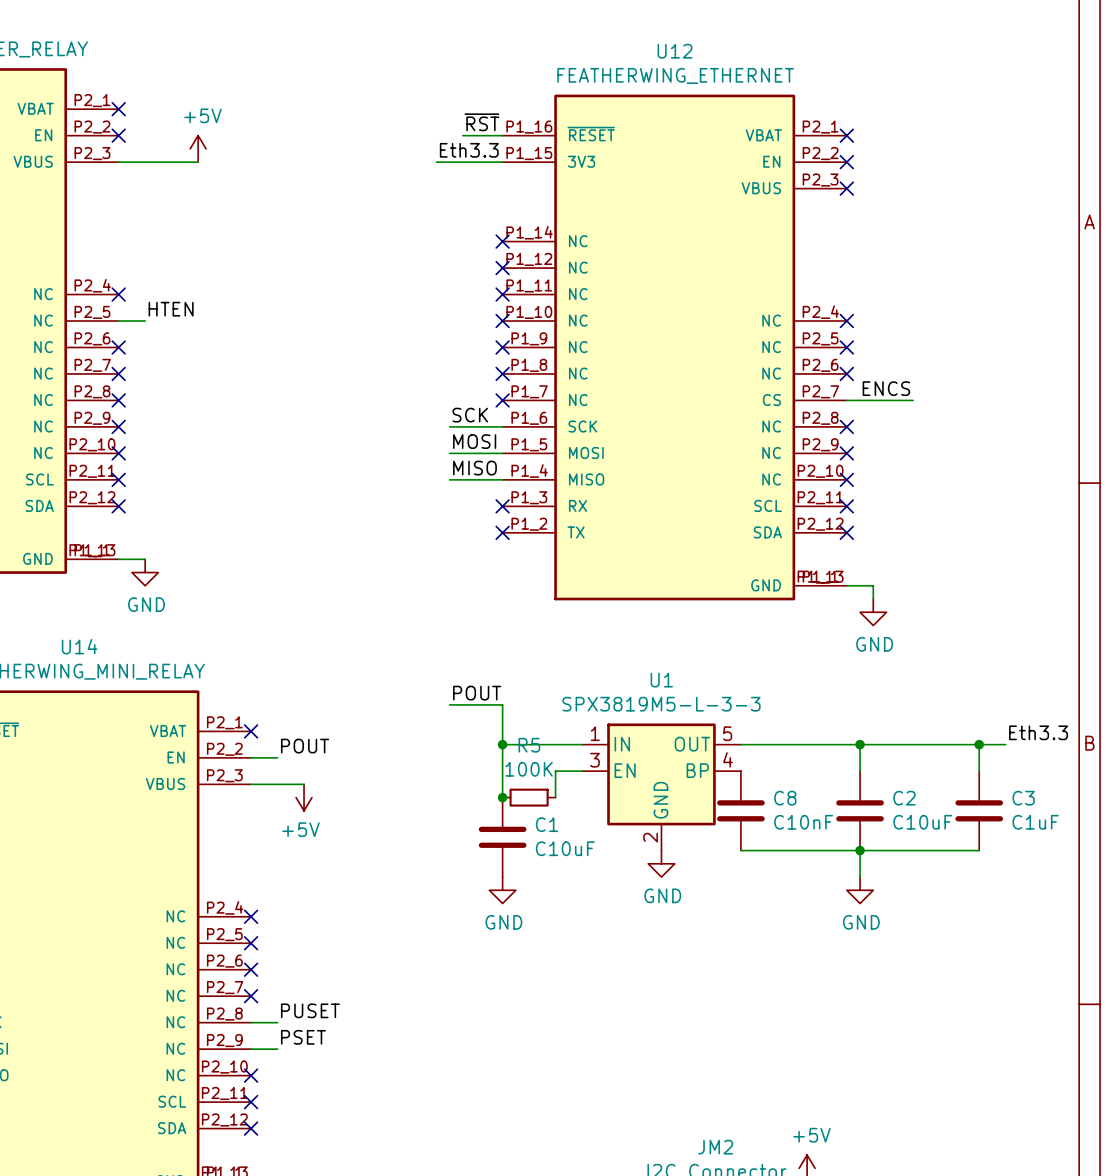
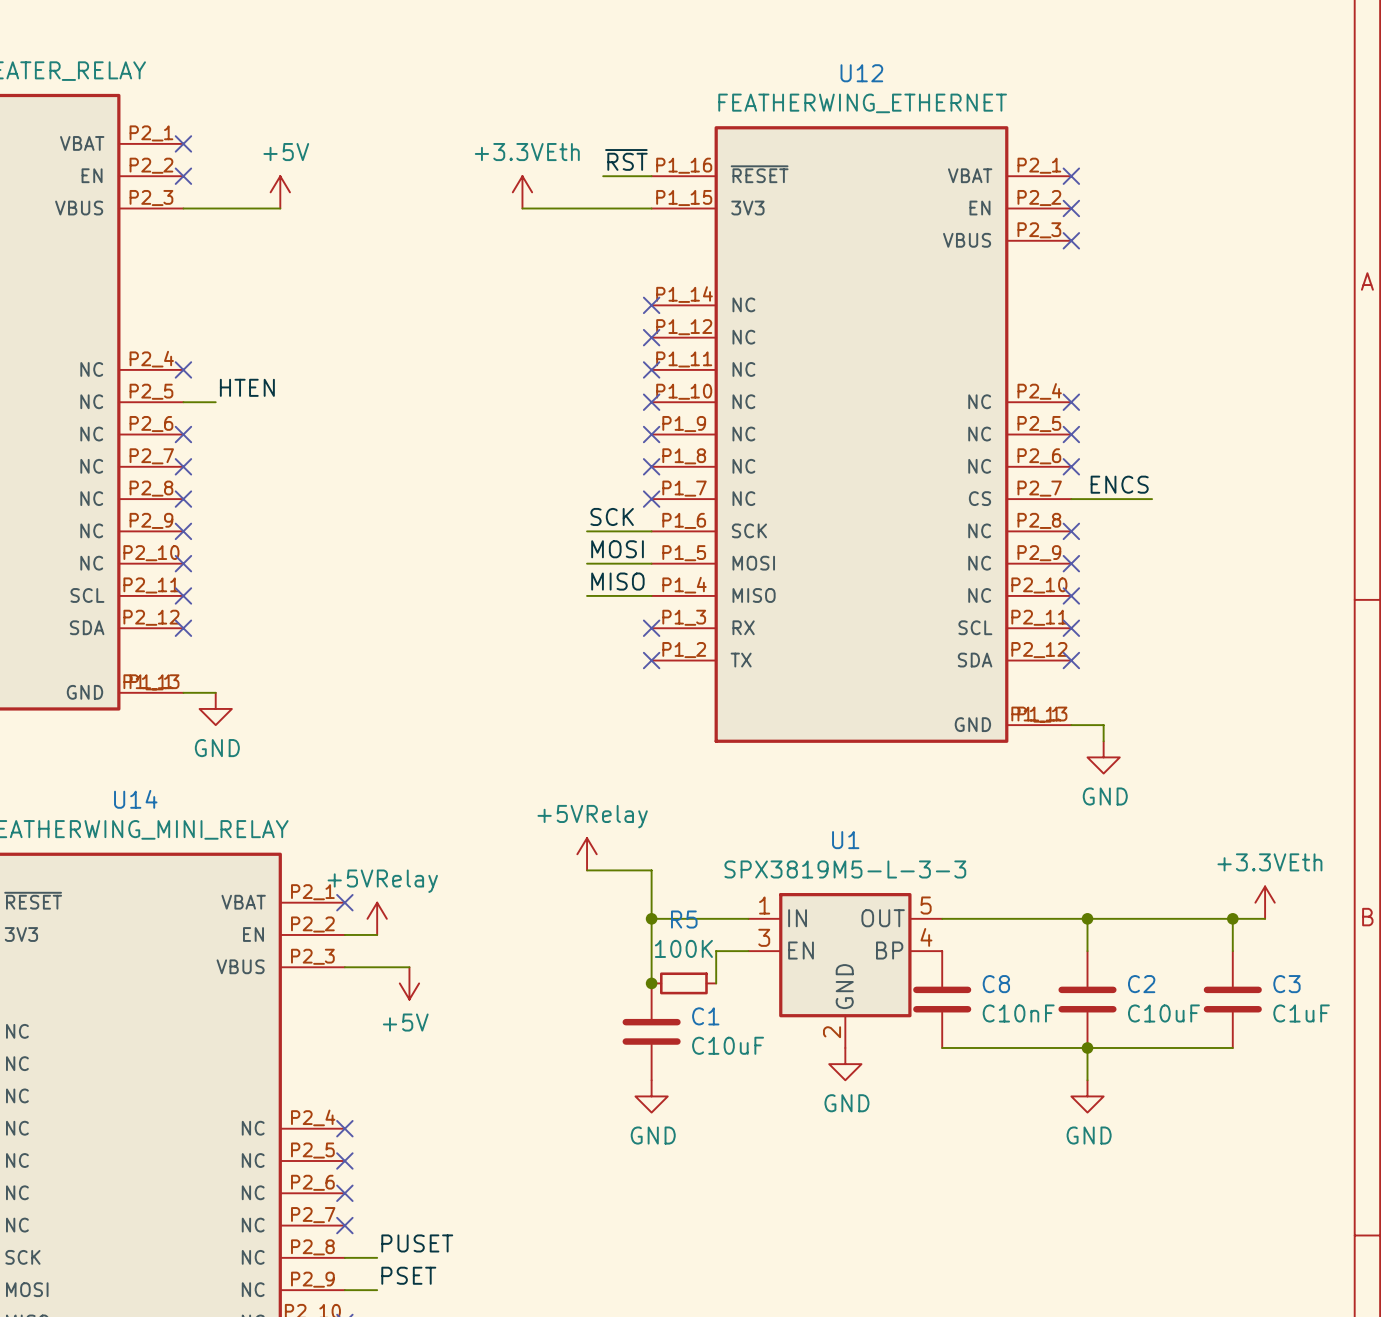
power symbol: none -> +3.3VEth (522, 192)
label: Eth3.3 (469, 150) -> none
wire: none -> (522, 208) (570, 208)
power symbol: none -> +5VRelay (587, 854)
label: POUT (477, 693) -> none
power symbol: none -> +3.3VEth (1265, 902)
label: Eth3.3 (1038, 732) -> none
power symbol: none -> +5VRelay (377, 918)
label: POUT (305, 746) -> none

